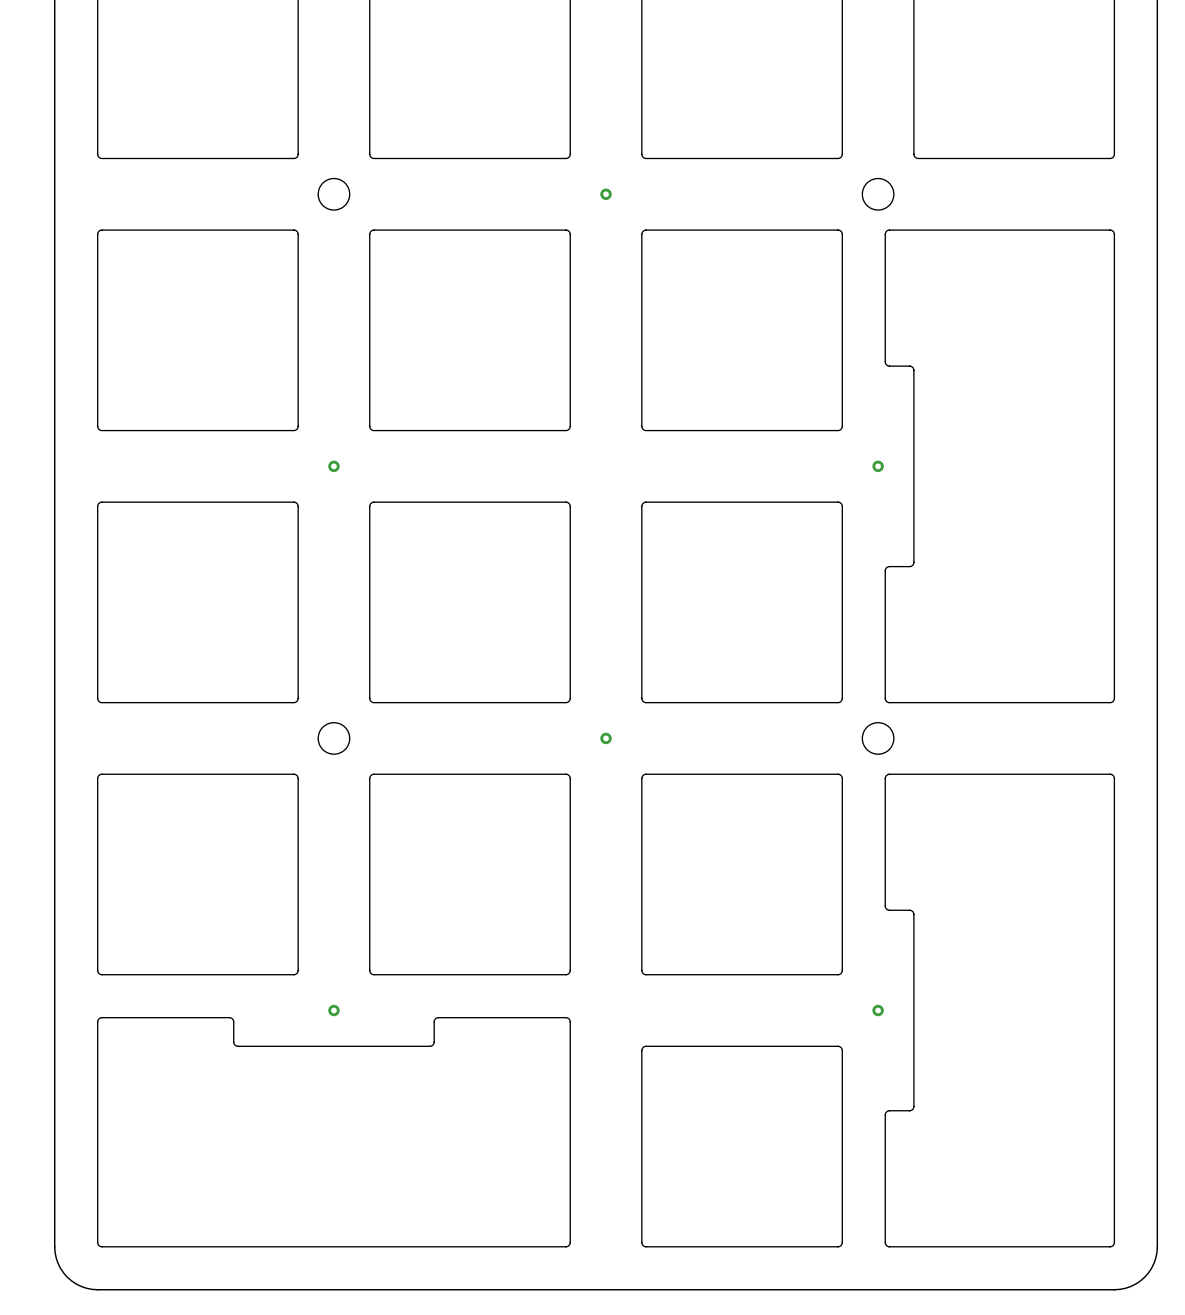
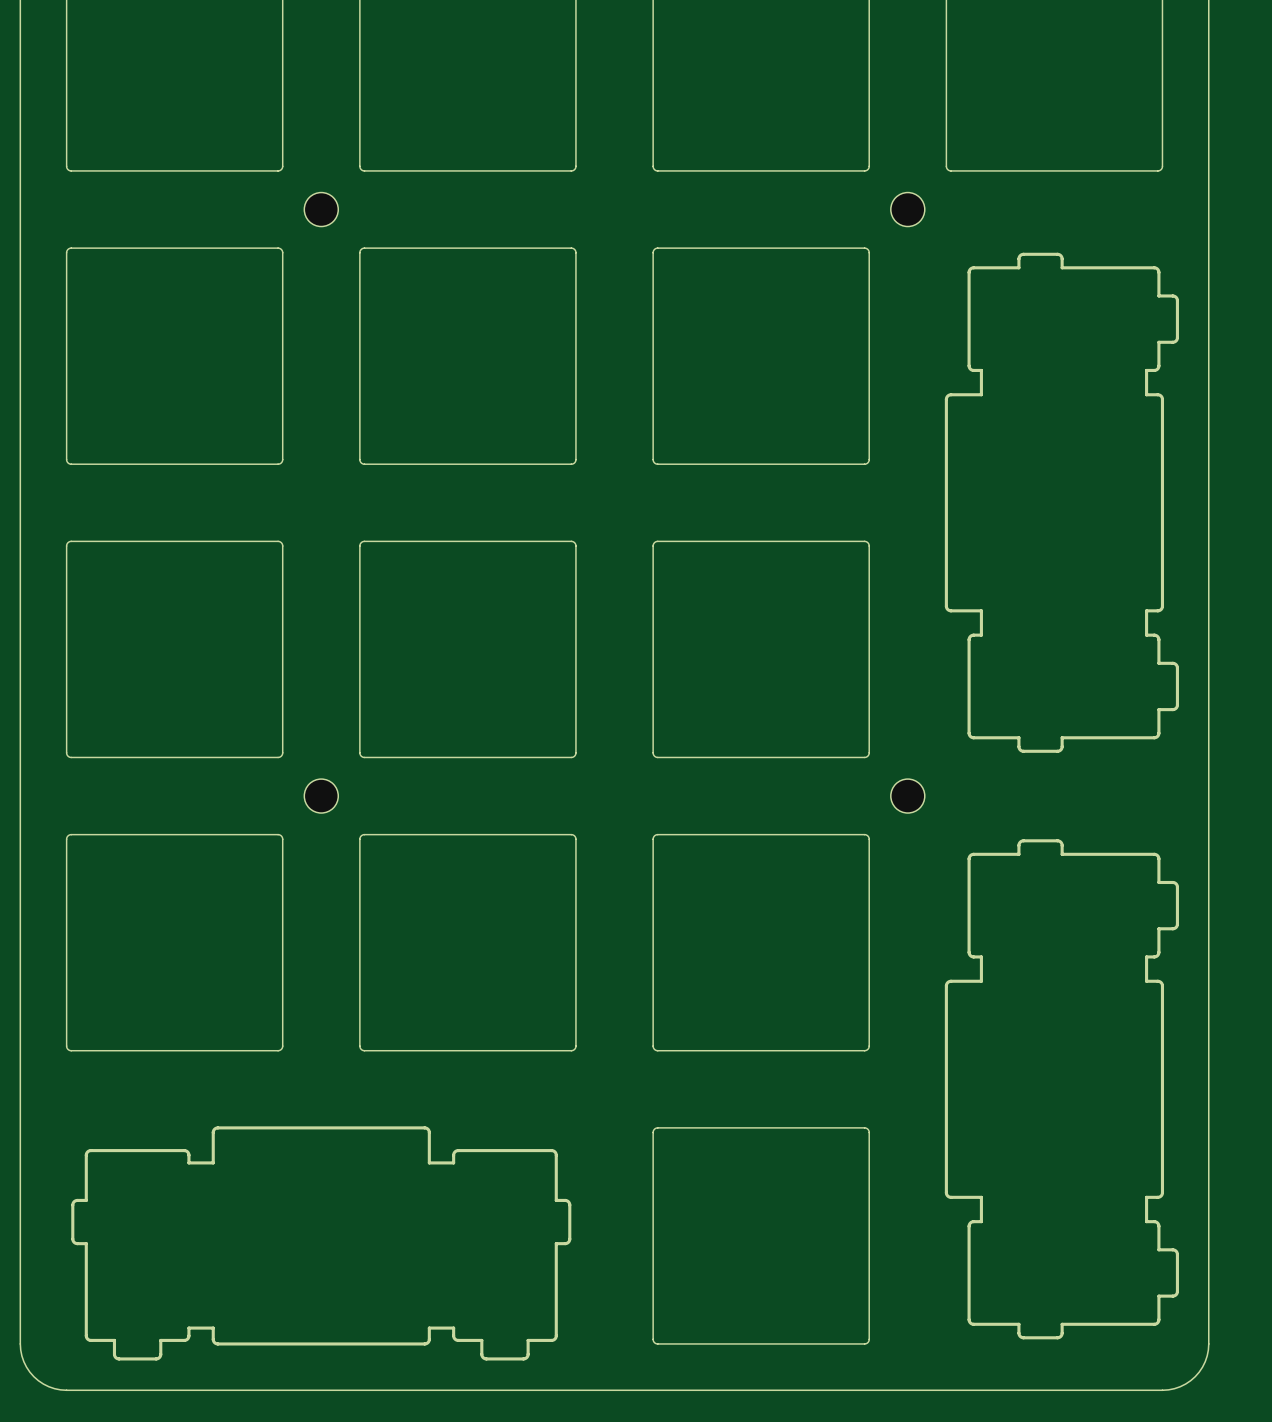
via: (606, 194) -> none
drawing: [884, 229, 1115, 703] -> none
drawing: none -> [944, 252, 1179, 753]
via: (333, 466) -> none
via: (878, 466) -> none
via: (606, 738) -> none
drawing: [884, 773, 1115, 1248] -> none
drawing: none -> [944, 839, 1179, 1340]
via: (333, 1010) -> none
via: (878, 1010) -> none
drawing: [97, 1017, 571, 1248] -> none
drawing: none -> [71, 1126, 572, 1361]

